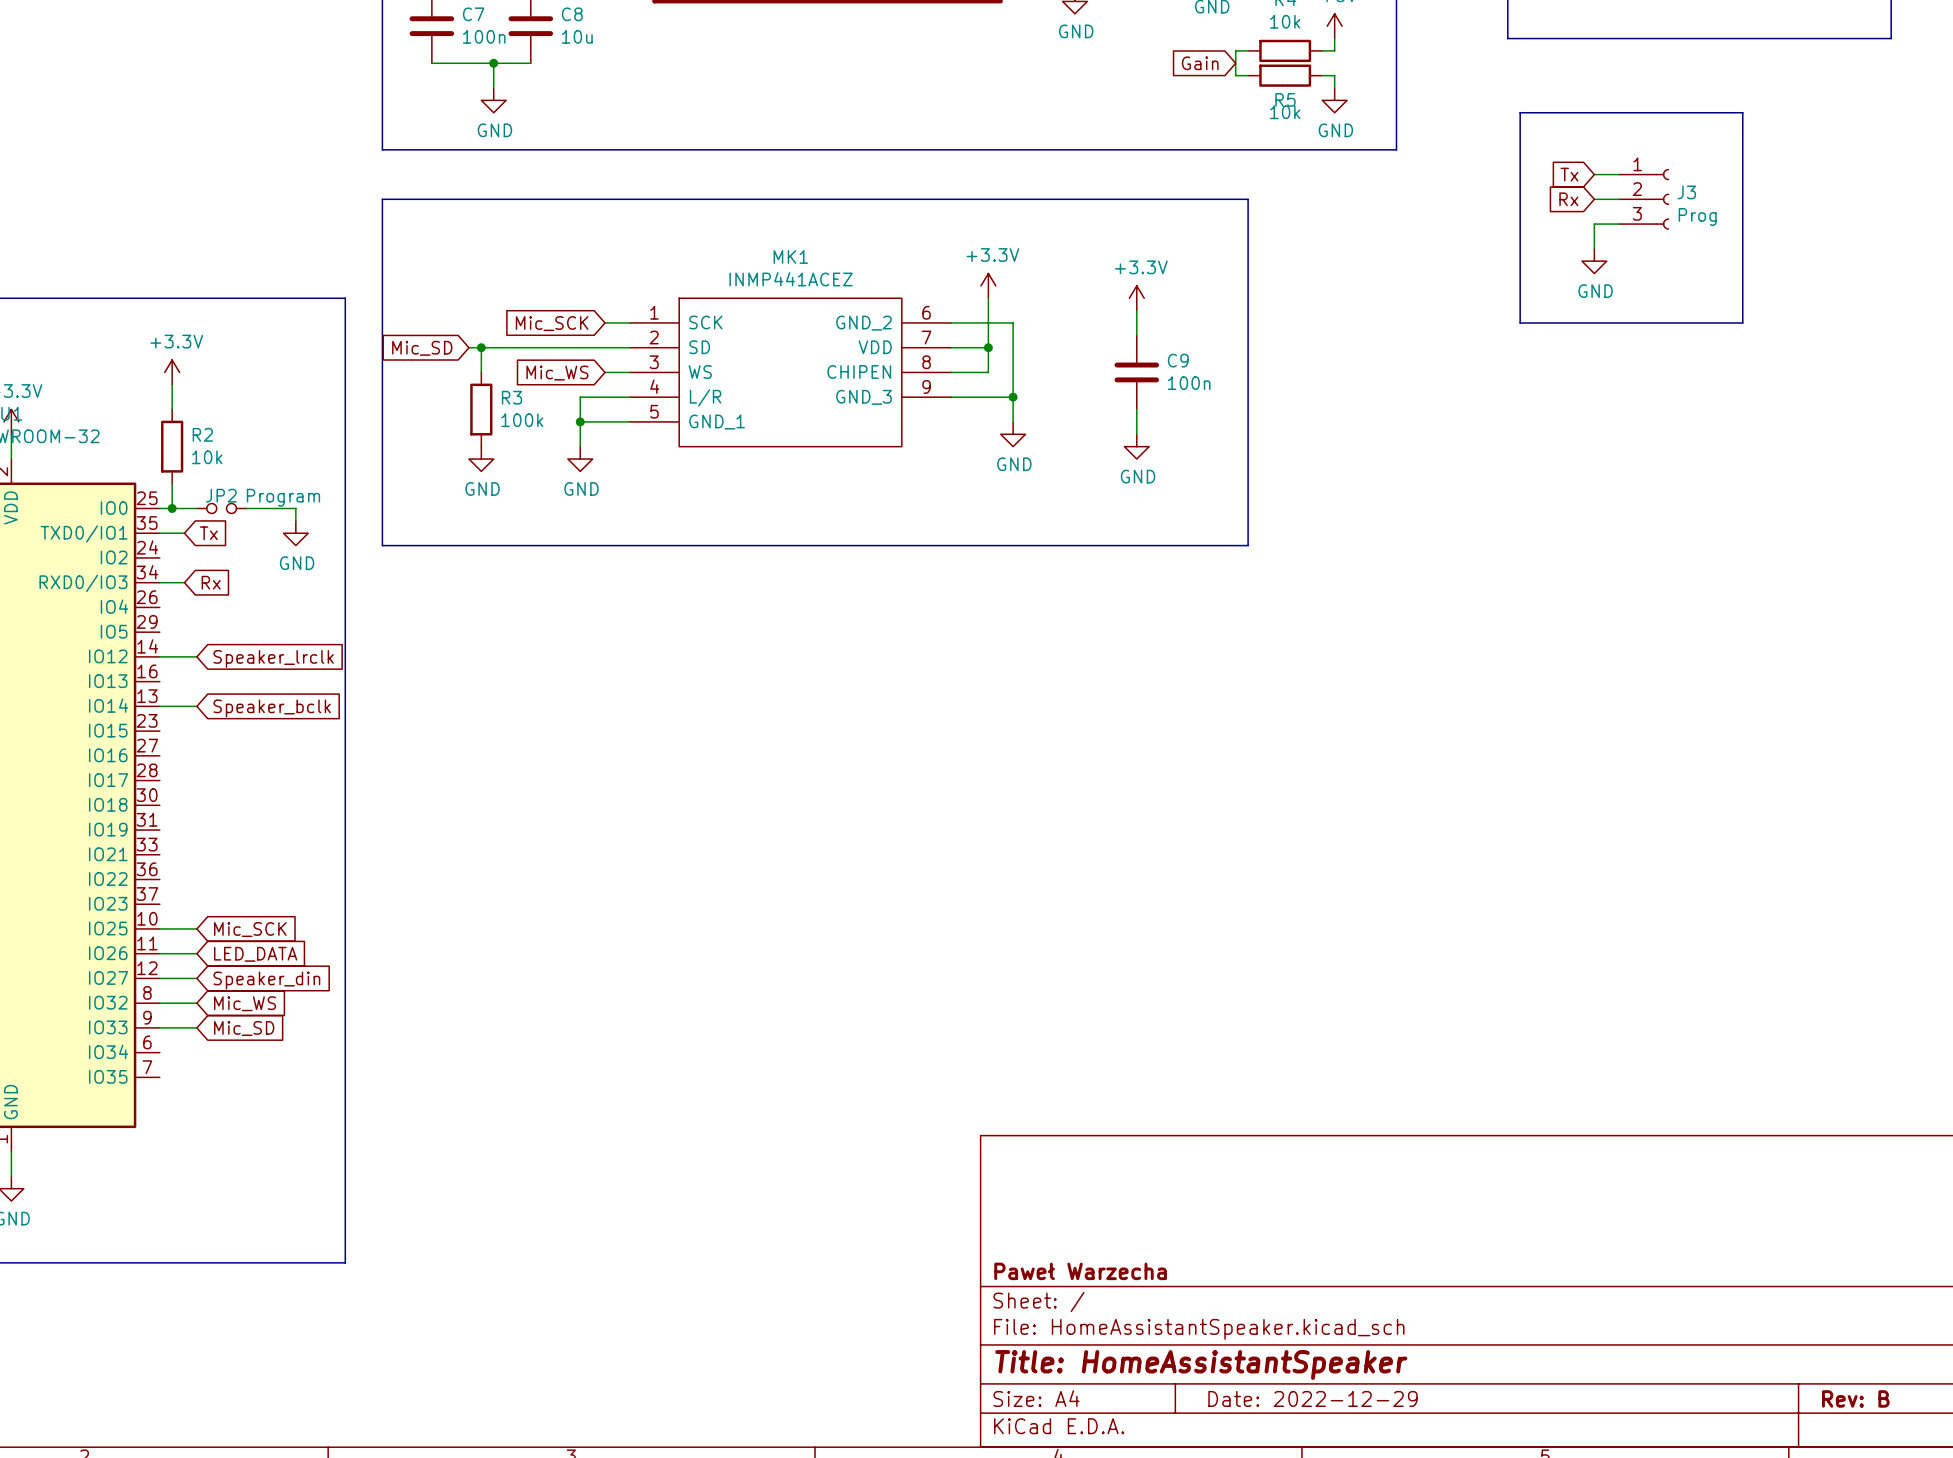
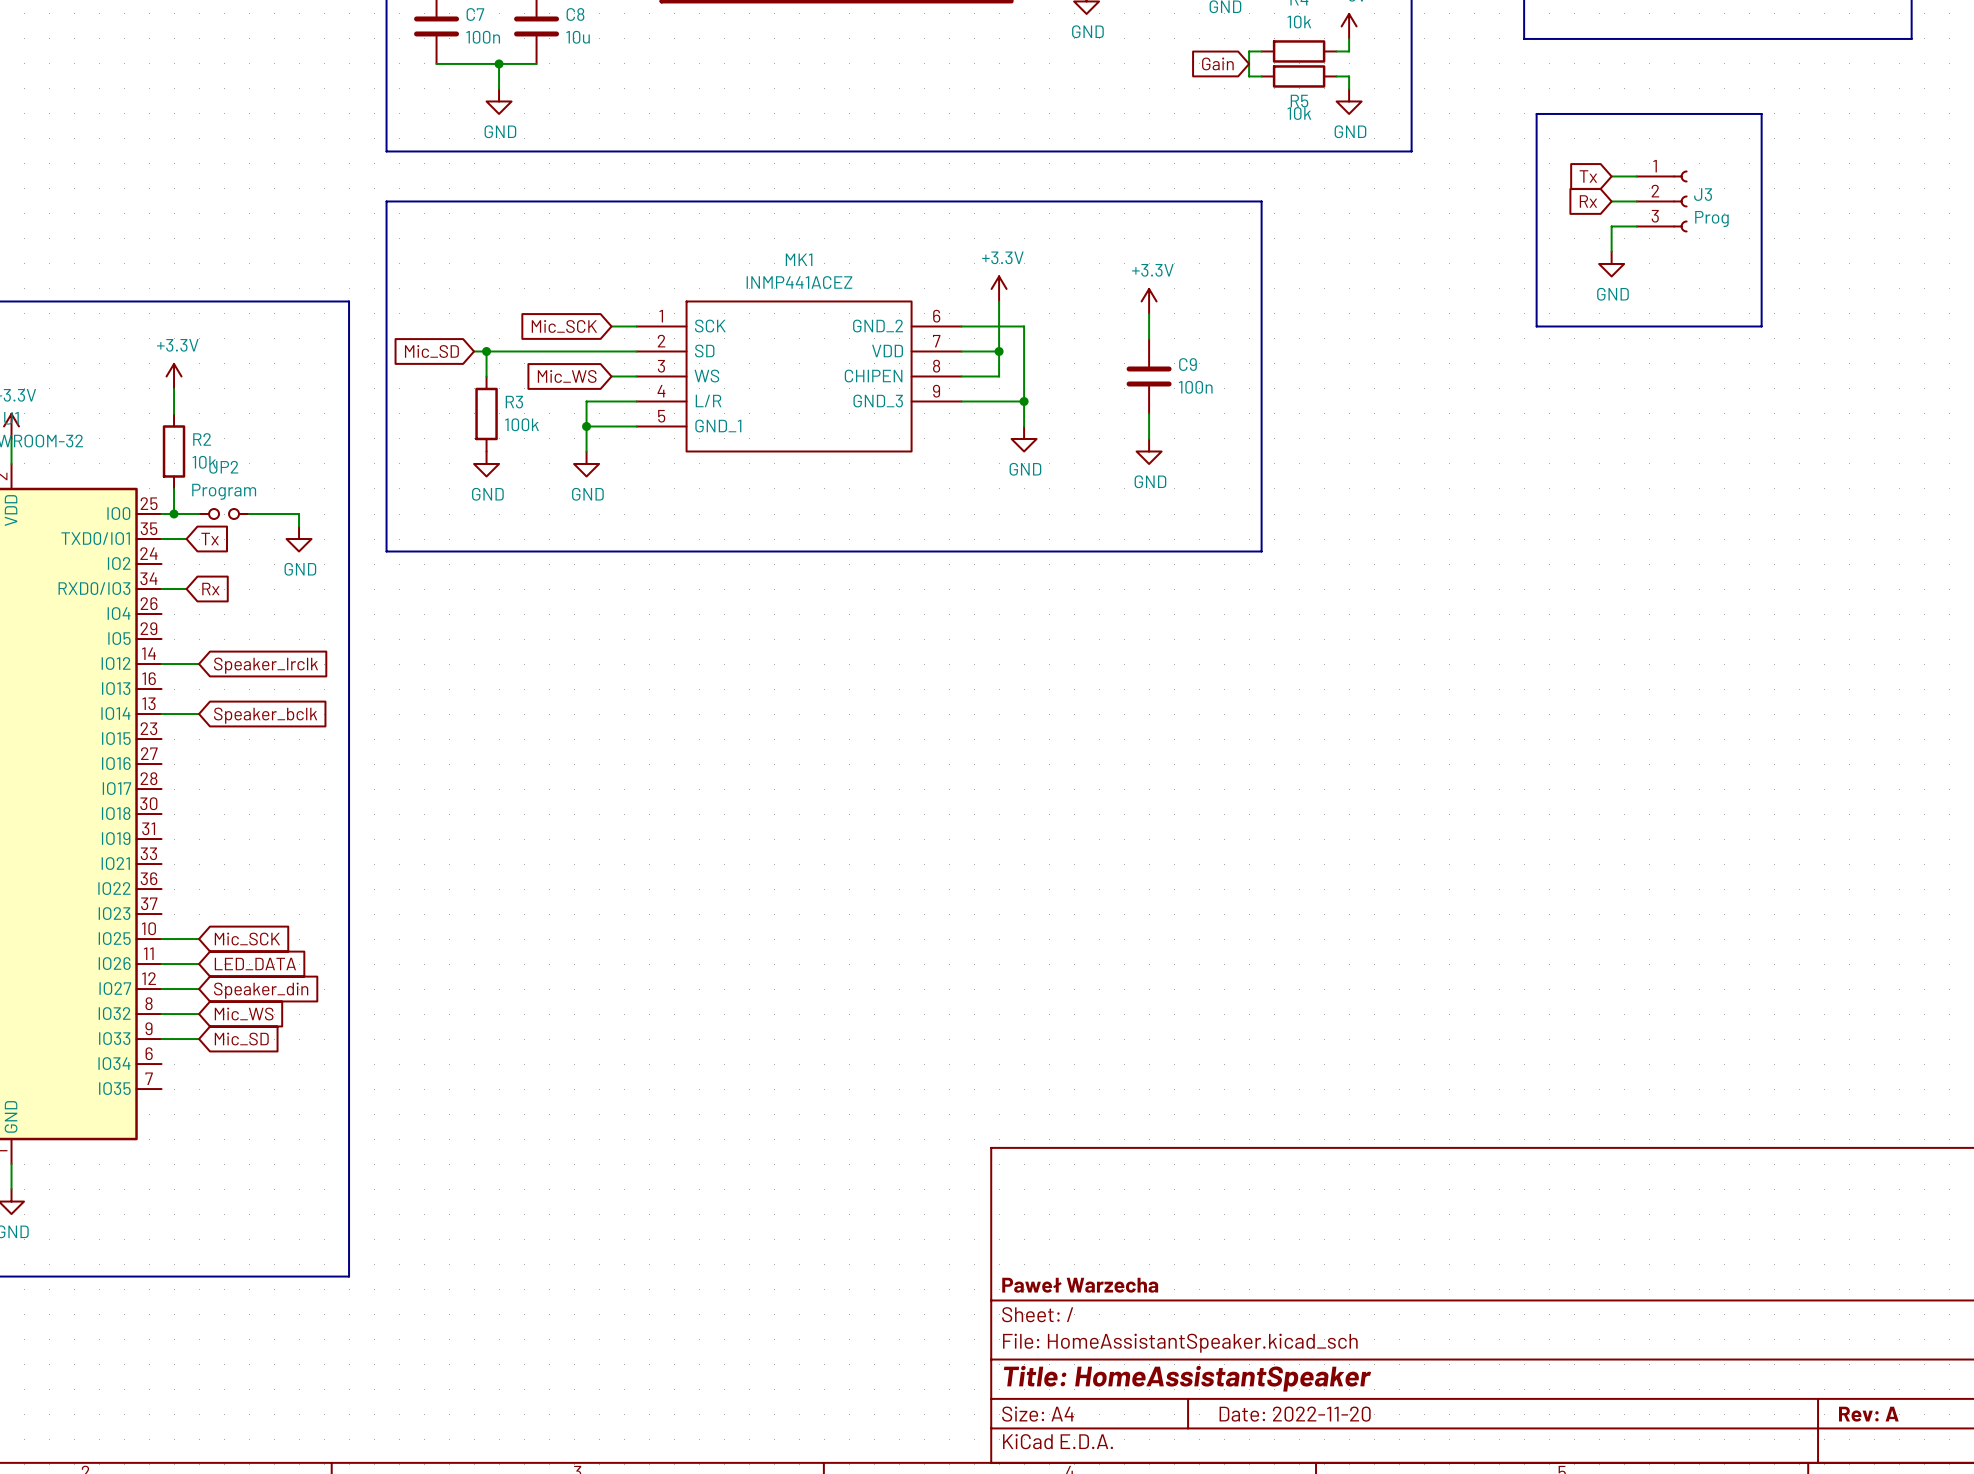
JP2 name position: JP2 (221, 495) -> JP2 (223, 467)
JP2 value position: Program (283, 497) -> Program (224, 491)
title block: Date: 2022-12-29 (1313, 1398) -> Date: 2022-11-20 (1295, 1414)
title block: Rev: B (1855, 1398) -> Rev: A (1868, 1414)

